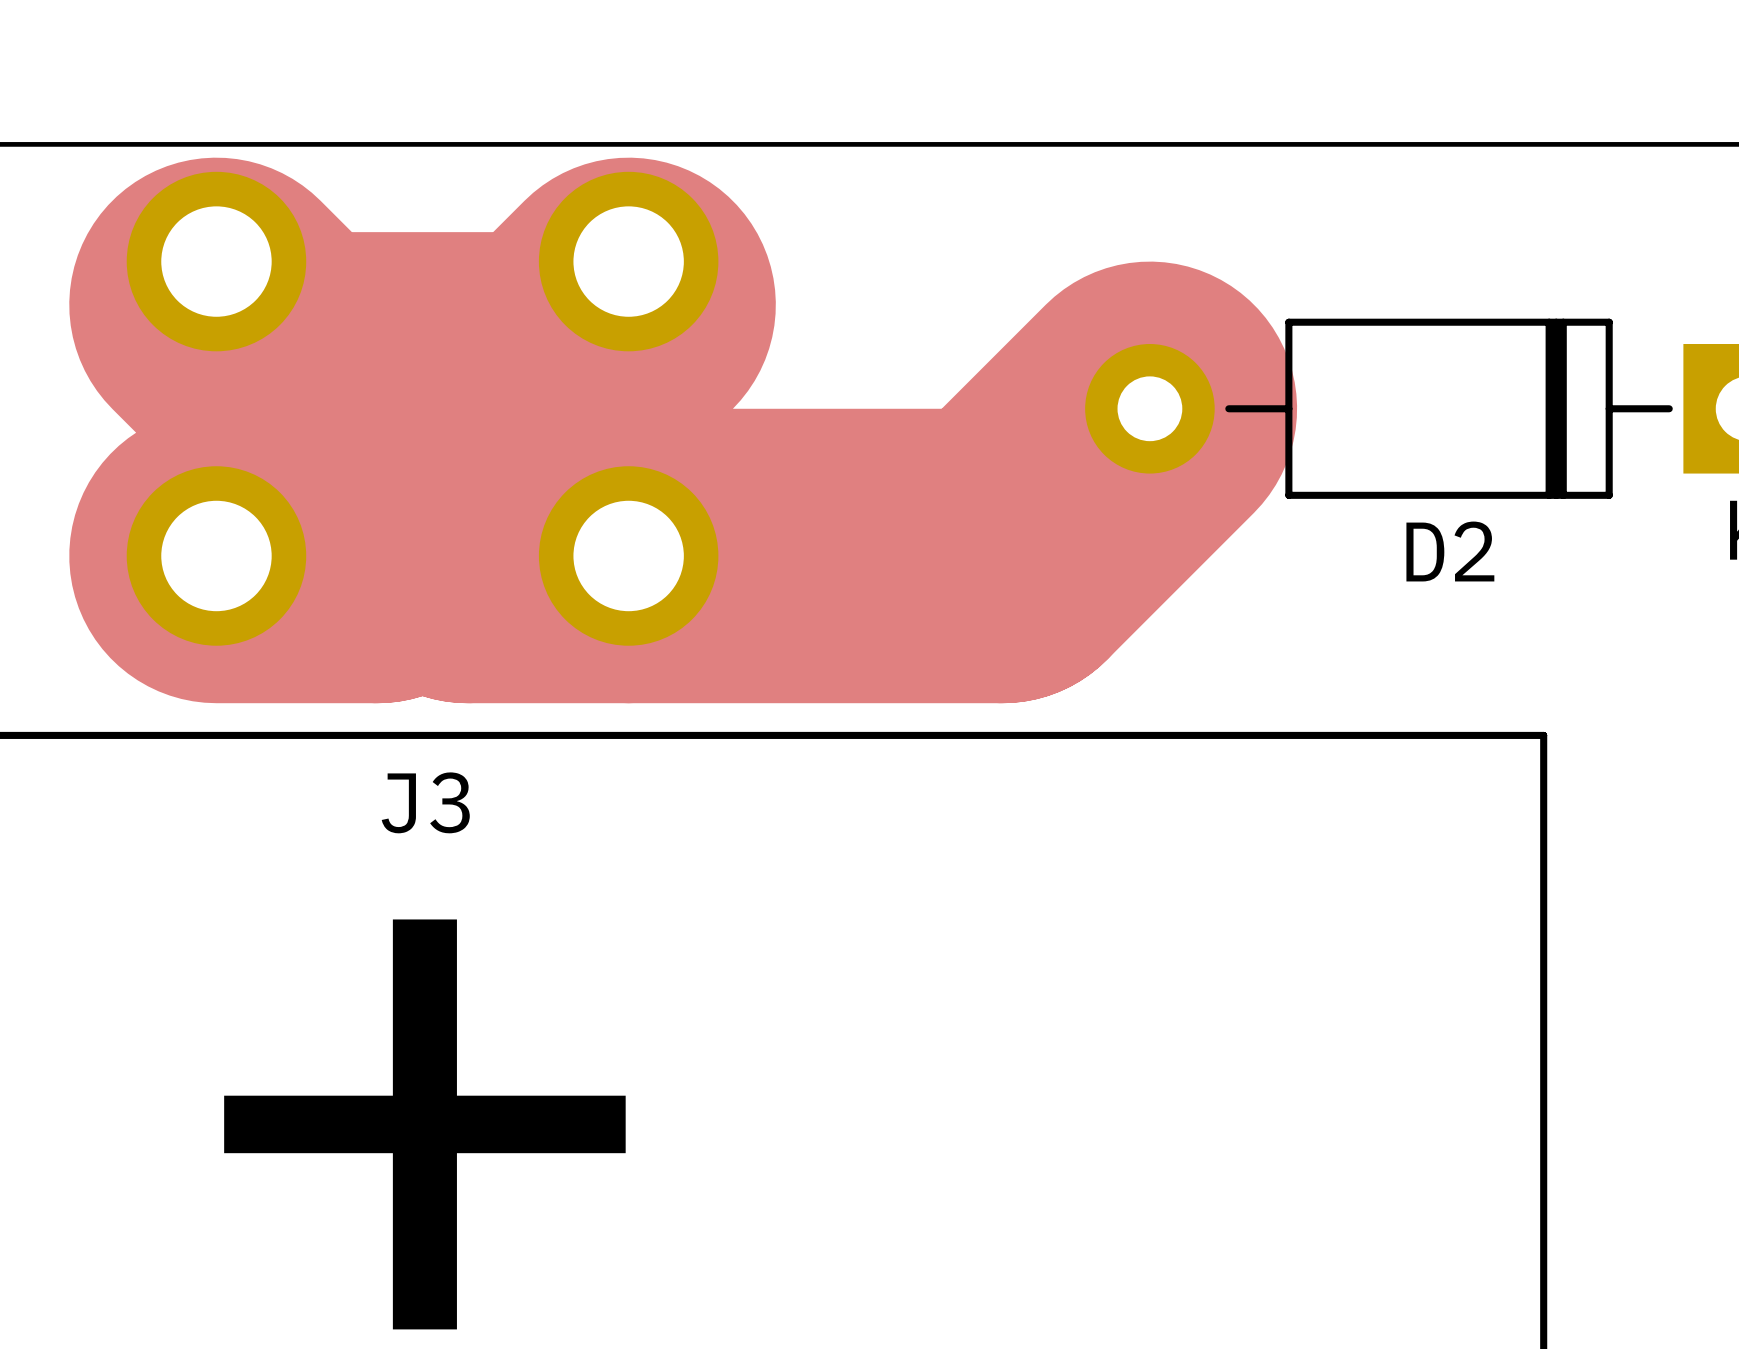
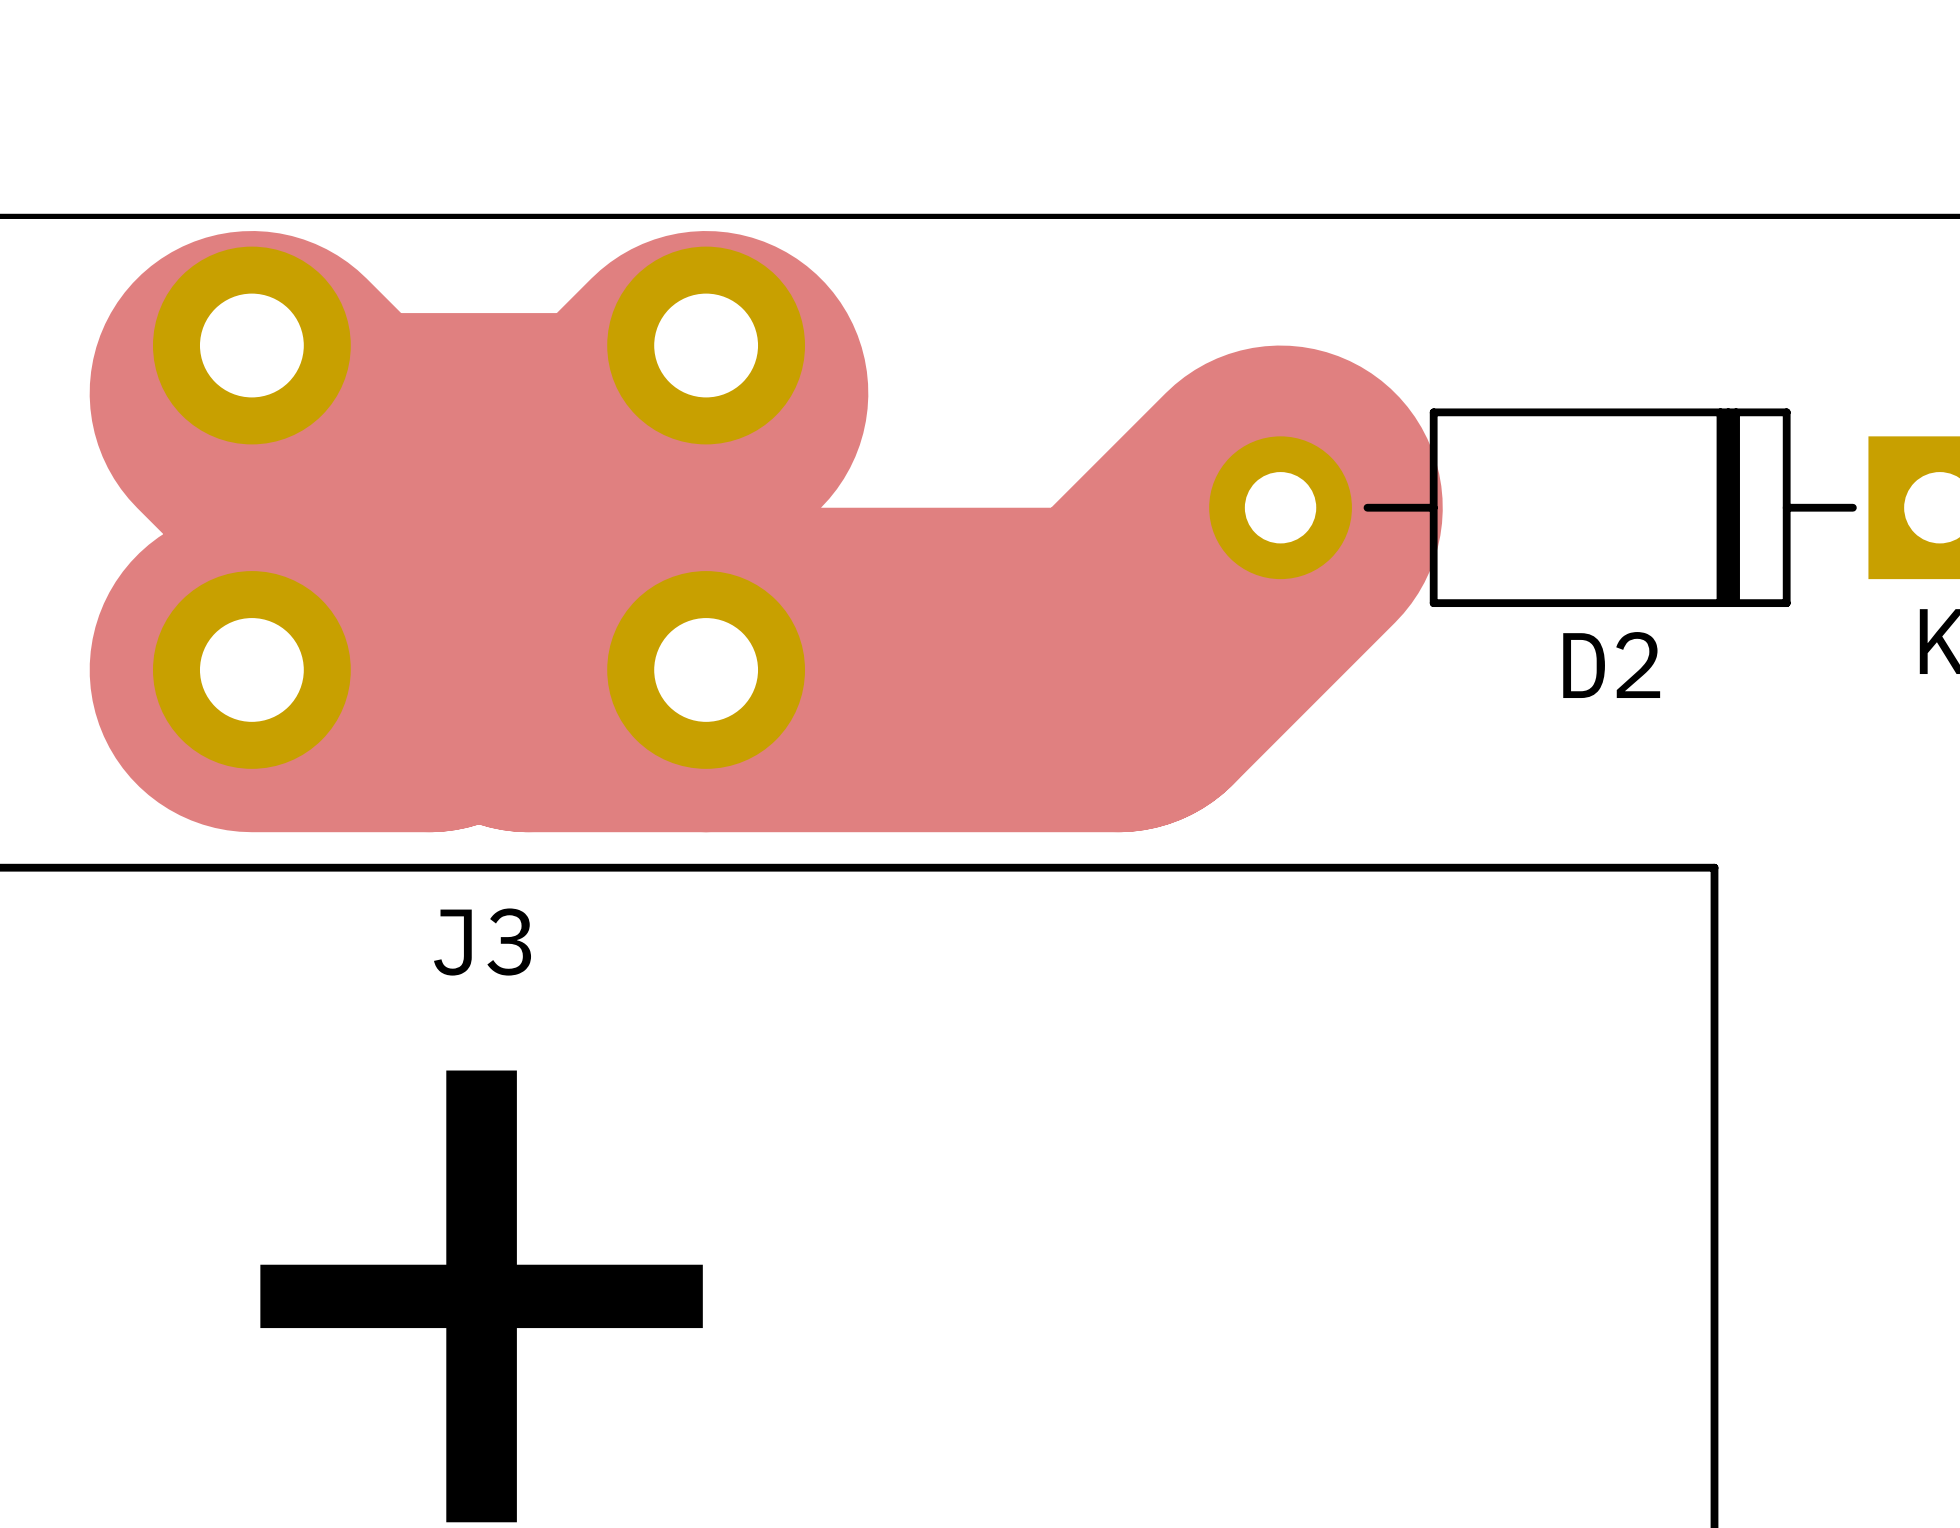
J3 footprint: [126, 171, 719, 646] -> [153, 246, 806, 769]

